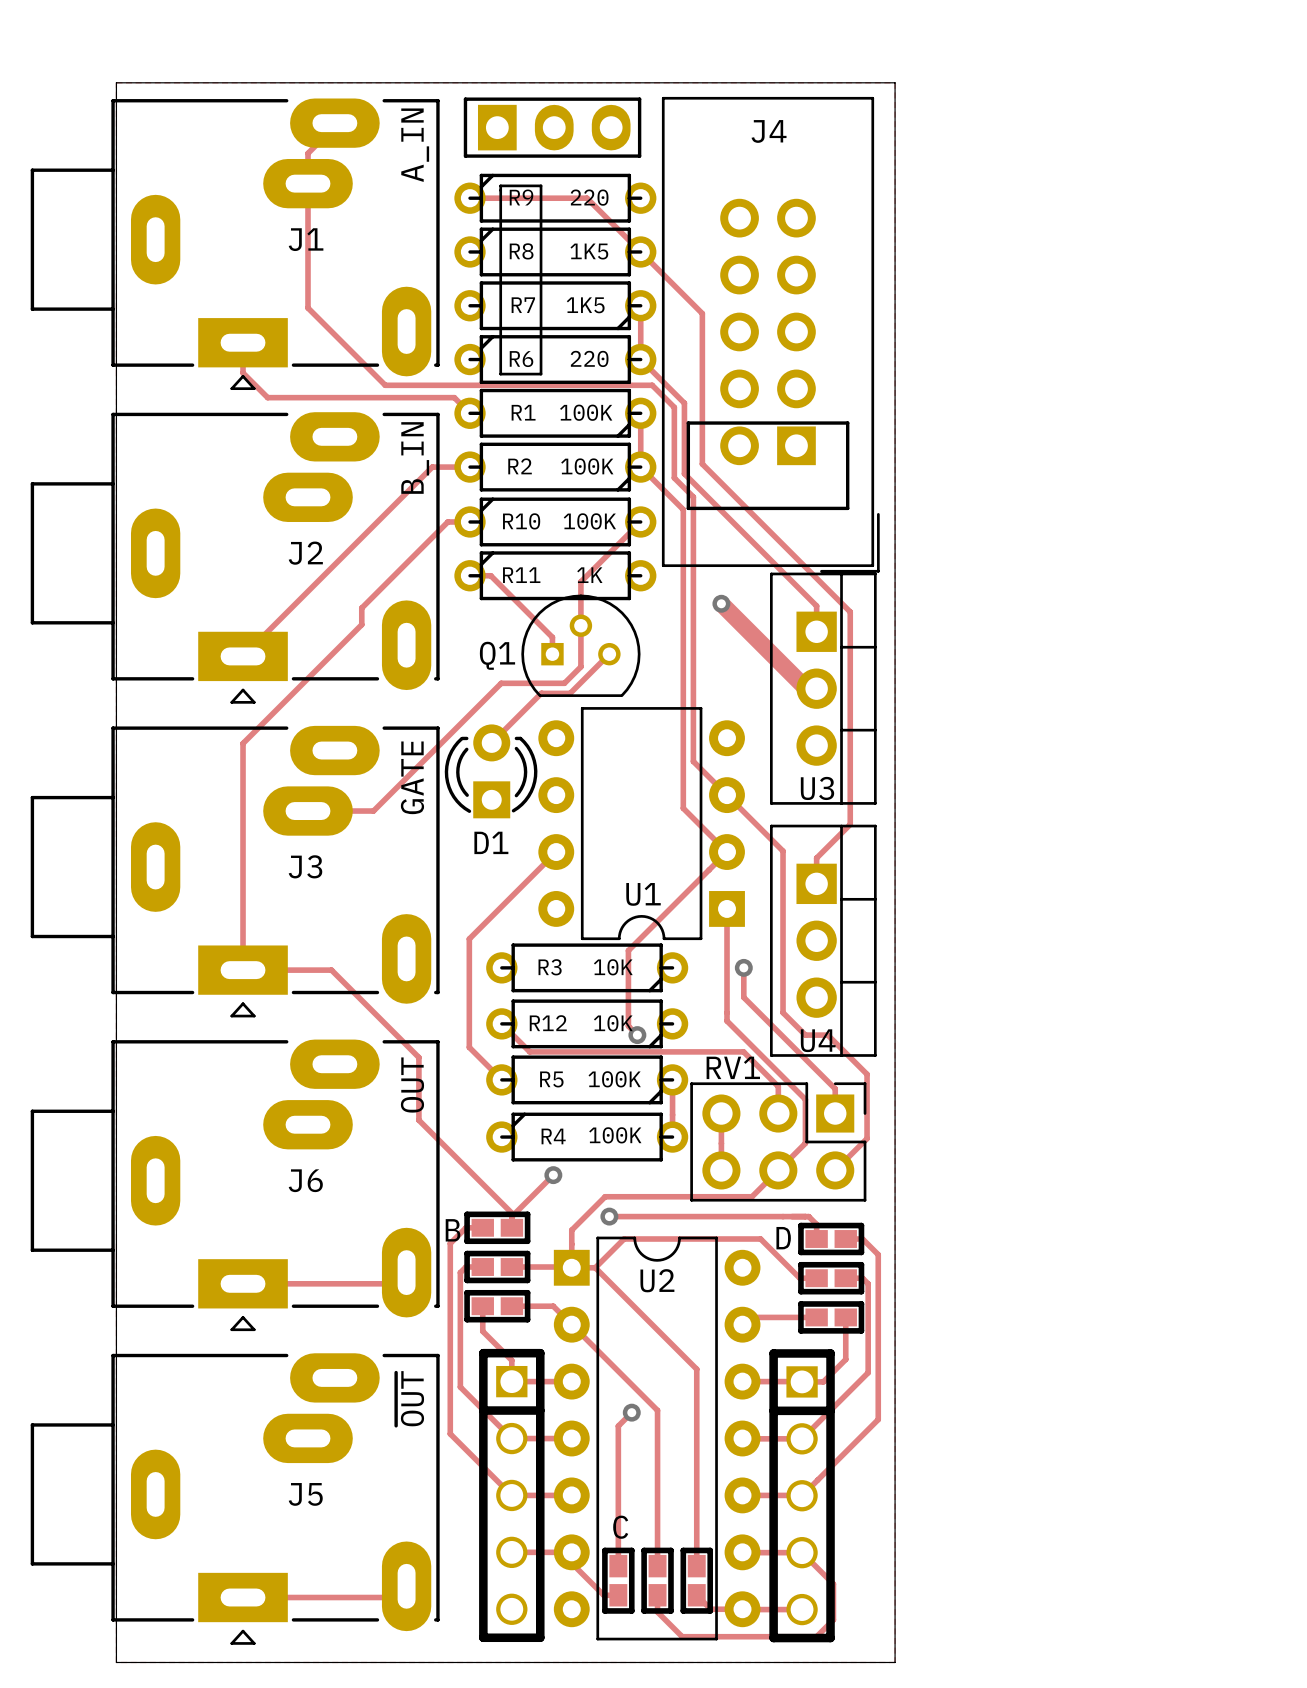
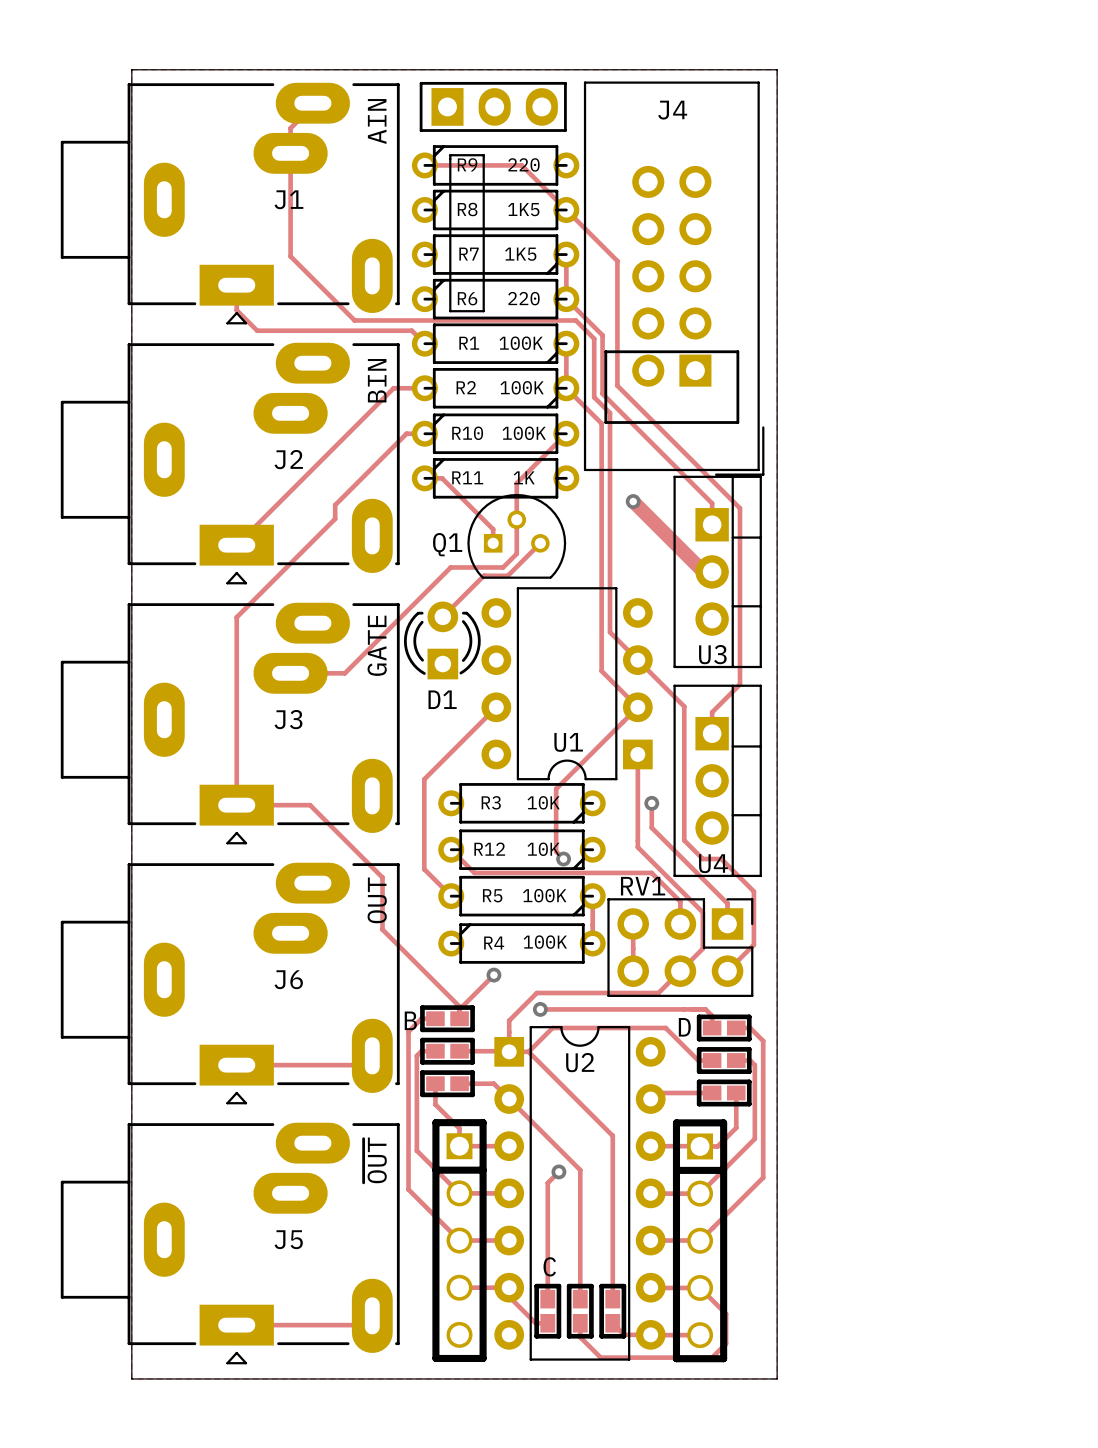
J1 value: A_IN (415, 145) -> AIN (377, 121)
J2 value: B_IN (415, 457) -> BIN (377, 380)

